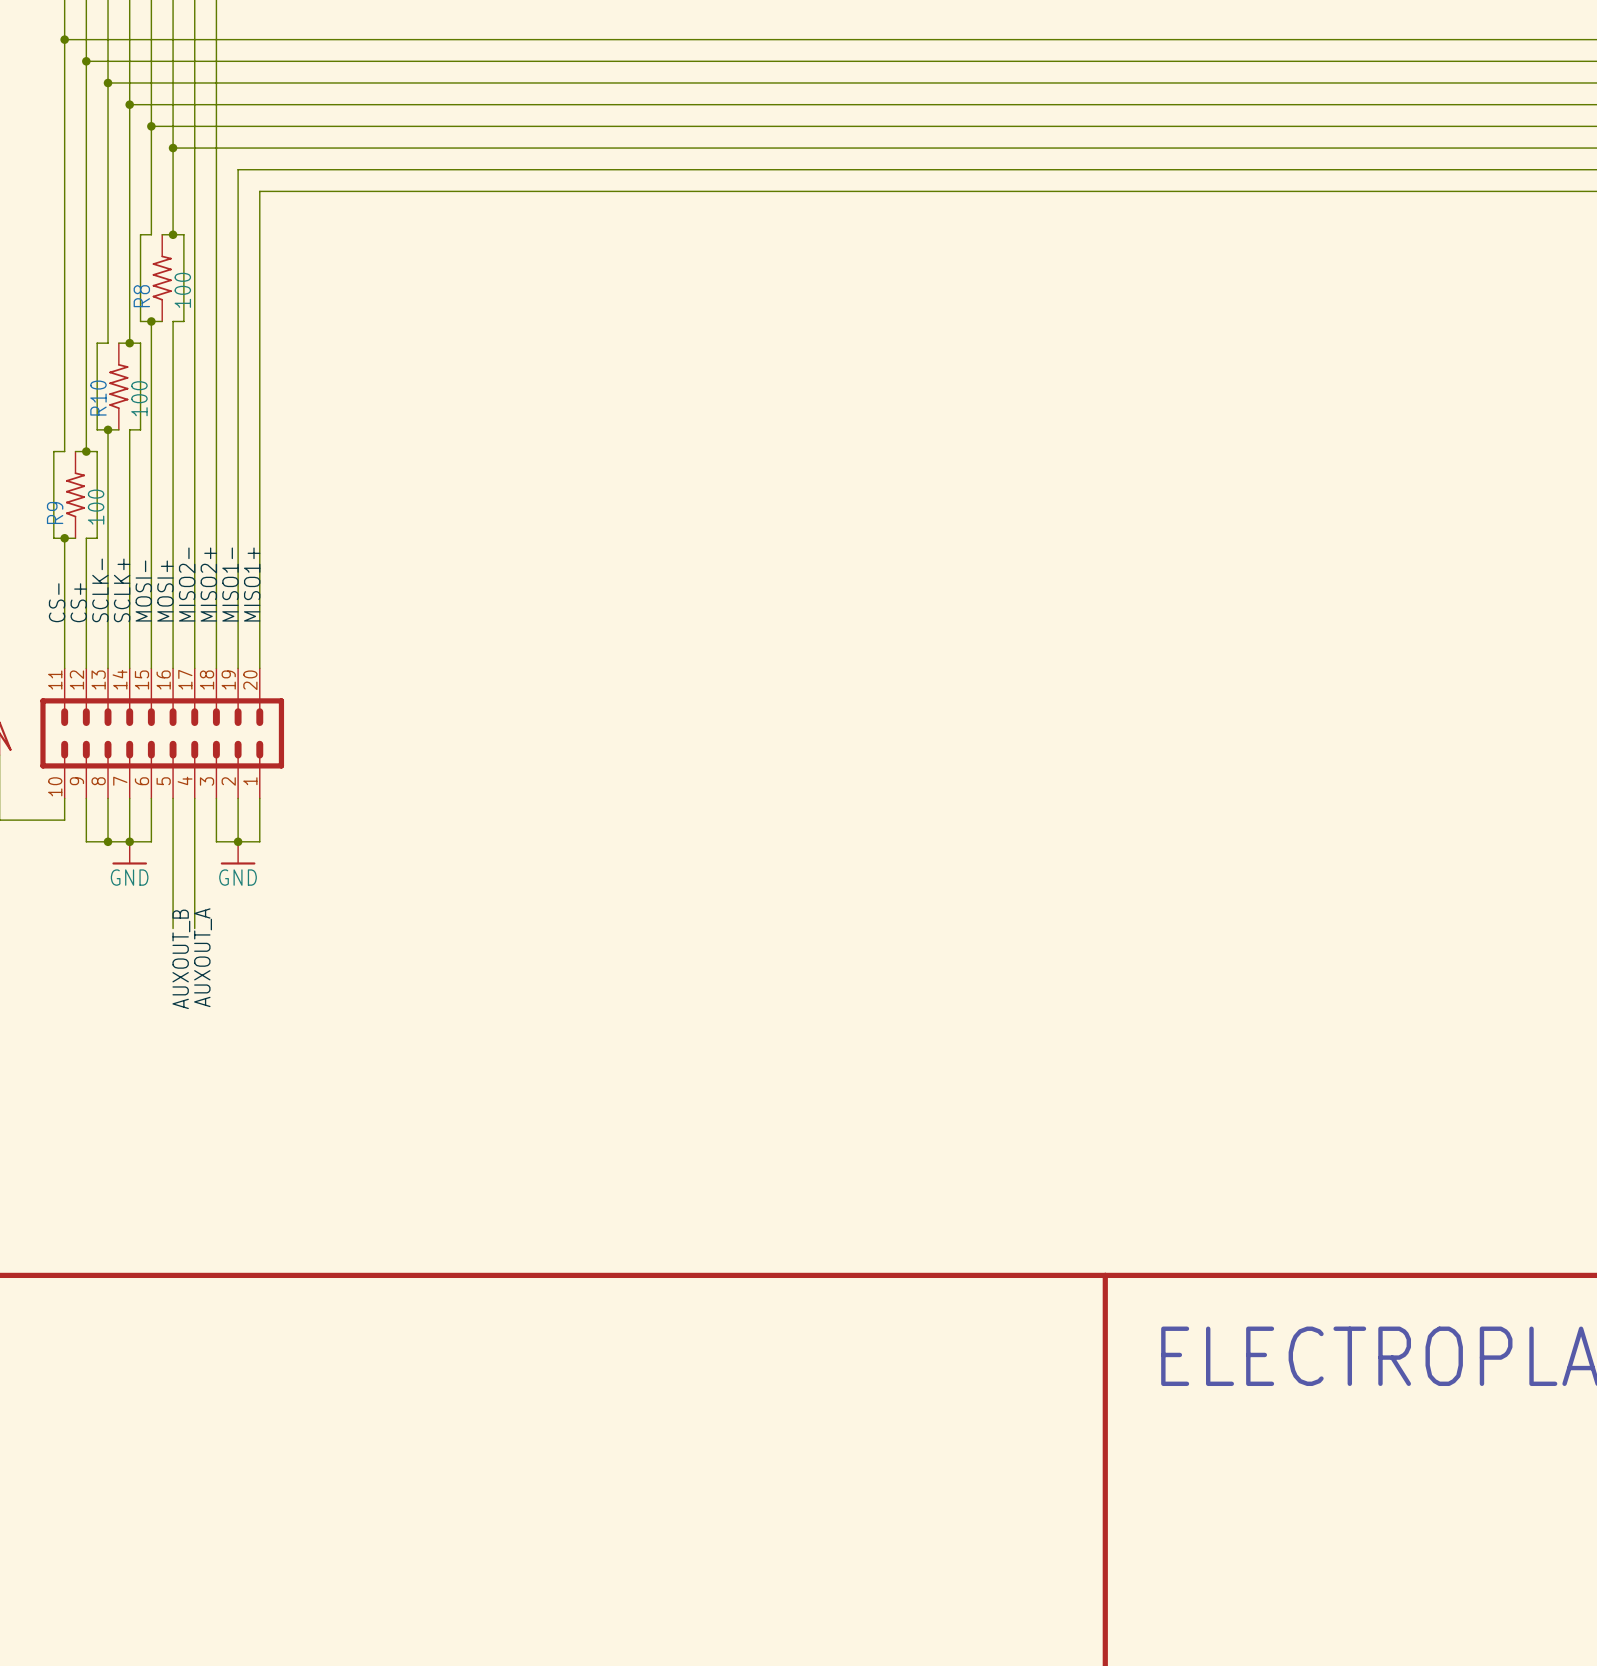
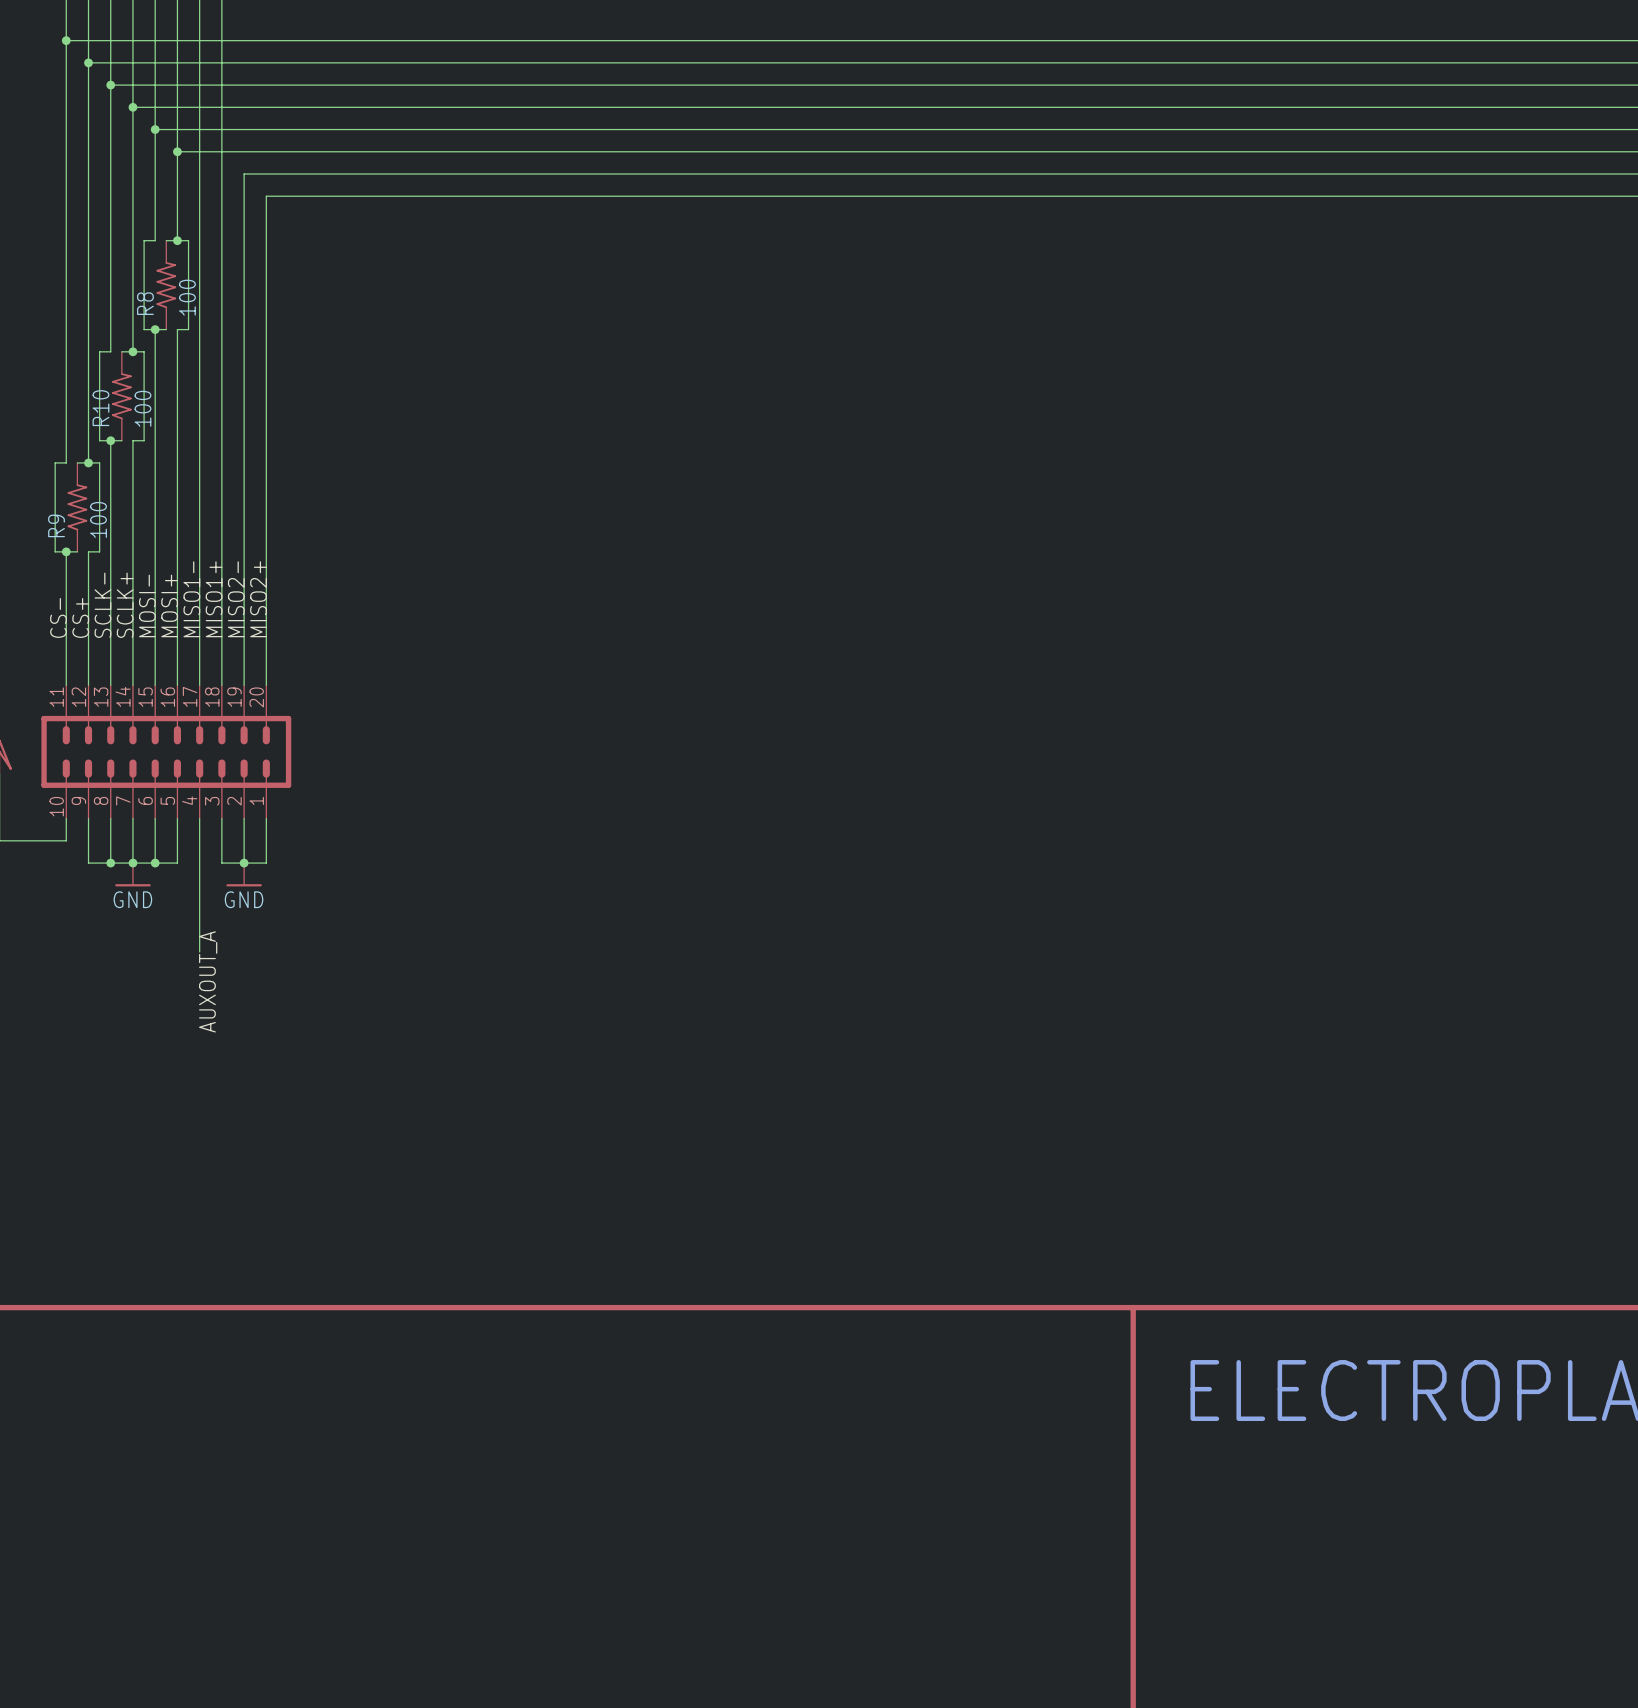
label: MISO2- (187, 584) -> MISO1- (191, 599)
label: MISO2+ (208, 584) -> MISO1+ (214, 599)
label: MISO1- (230, 584) -> MISO2- (236, 599)
label: MISO1+ (252, 584) -> MISO2+ (258, 599)
junction: none -> (155, 863)
wire: (173, 841) (173, 928) -> (177, 863) (155, 863)
label: AUXOUT_B (181, 959) -> none

